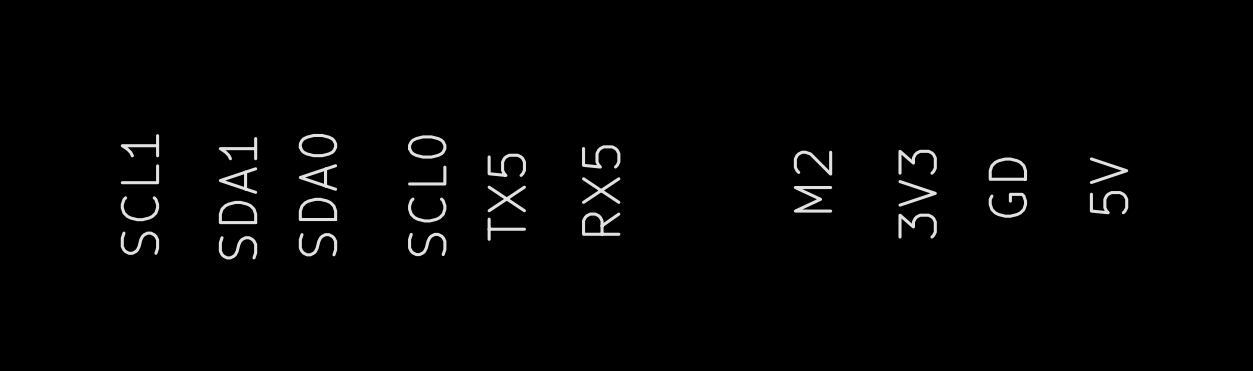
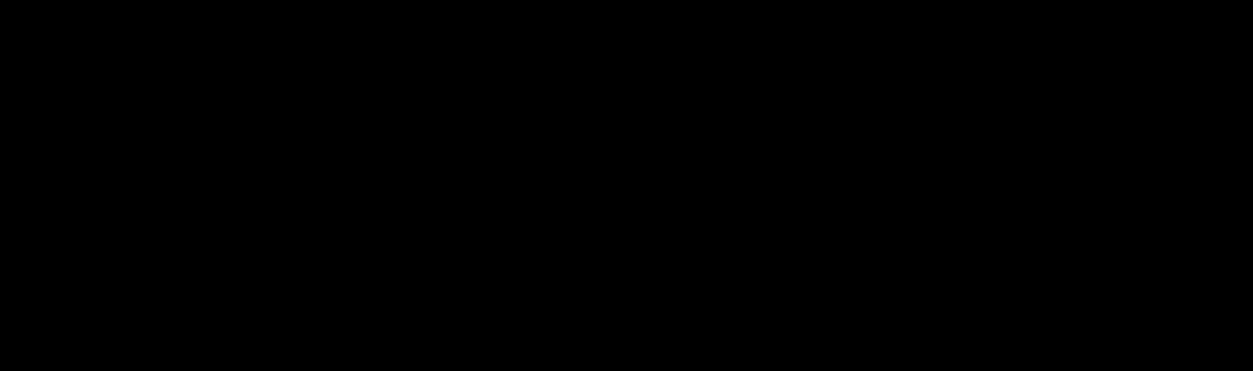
text: M2 (813, 181) -> none
text: 5V (1109, 185) -> none
text: GD (1007, 187) -> none
text: RX5 (601, 190) -> none
text: SCL1 (139, 194) -> none
text: 3V3 (917, 194) -> none
text: SDA0 (317, 195) -> none
text: SCL0 (427, 195) -> none
text: TX5 (506, 197) -> none
text: SDA1 (238, 198) -> none

